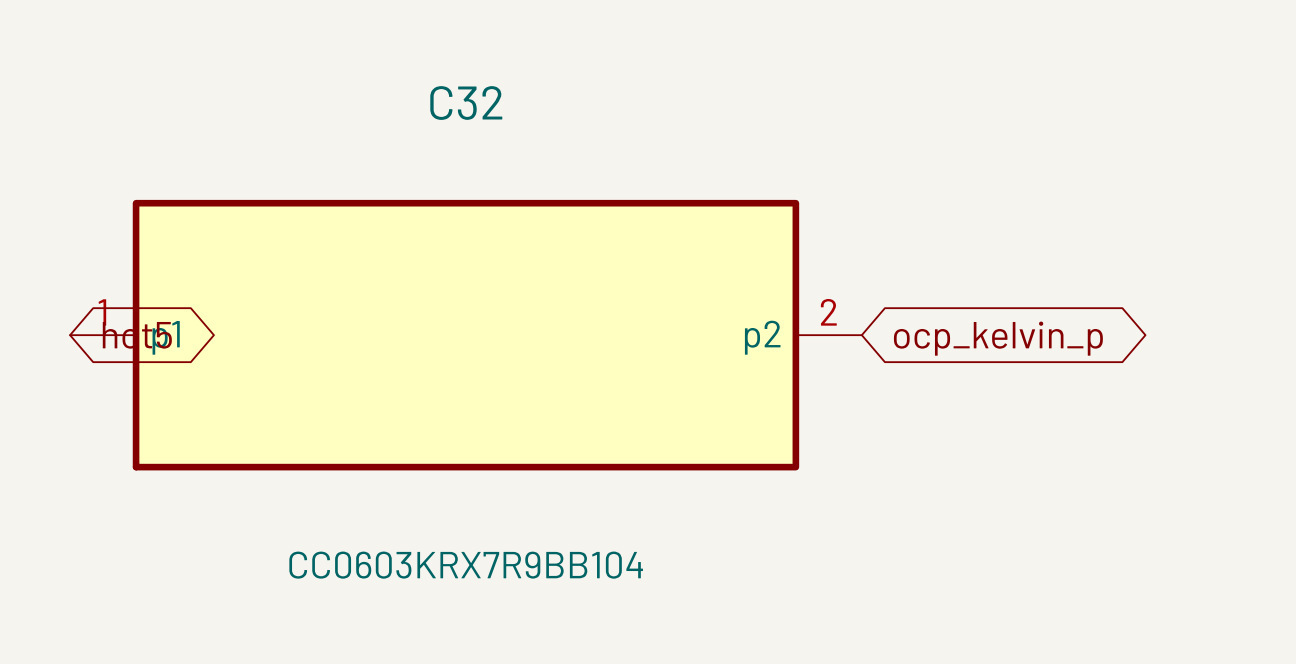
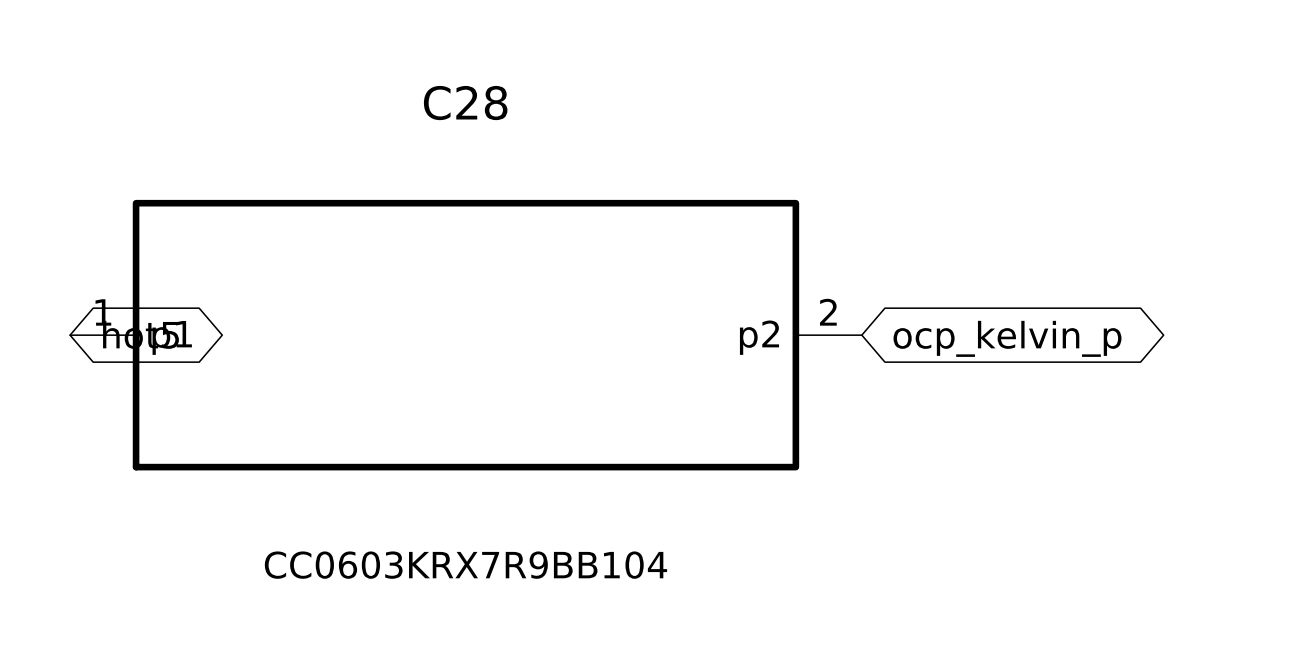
C32 name: C32 (466, 103) -> C28 (465, 103)

